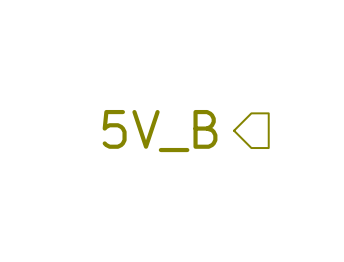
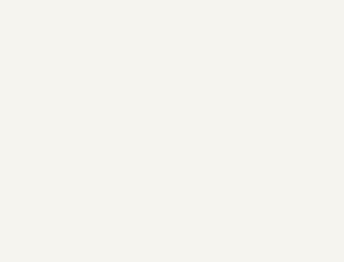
hierarchical label: 5V_B (160, 131) -> none

